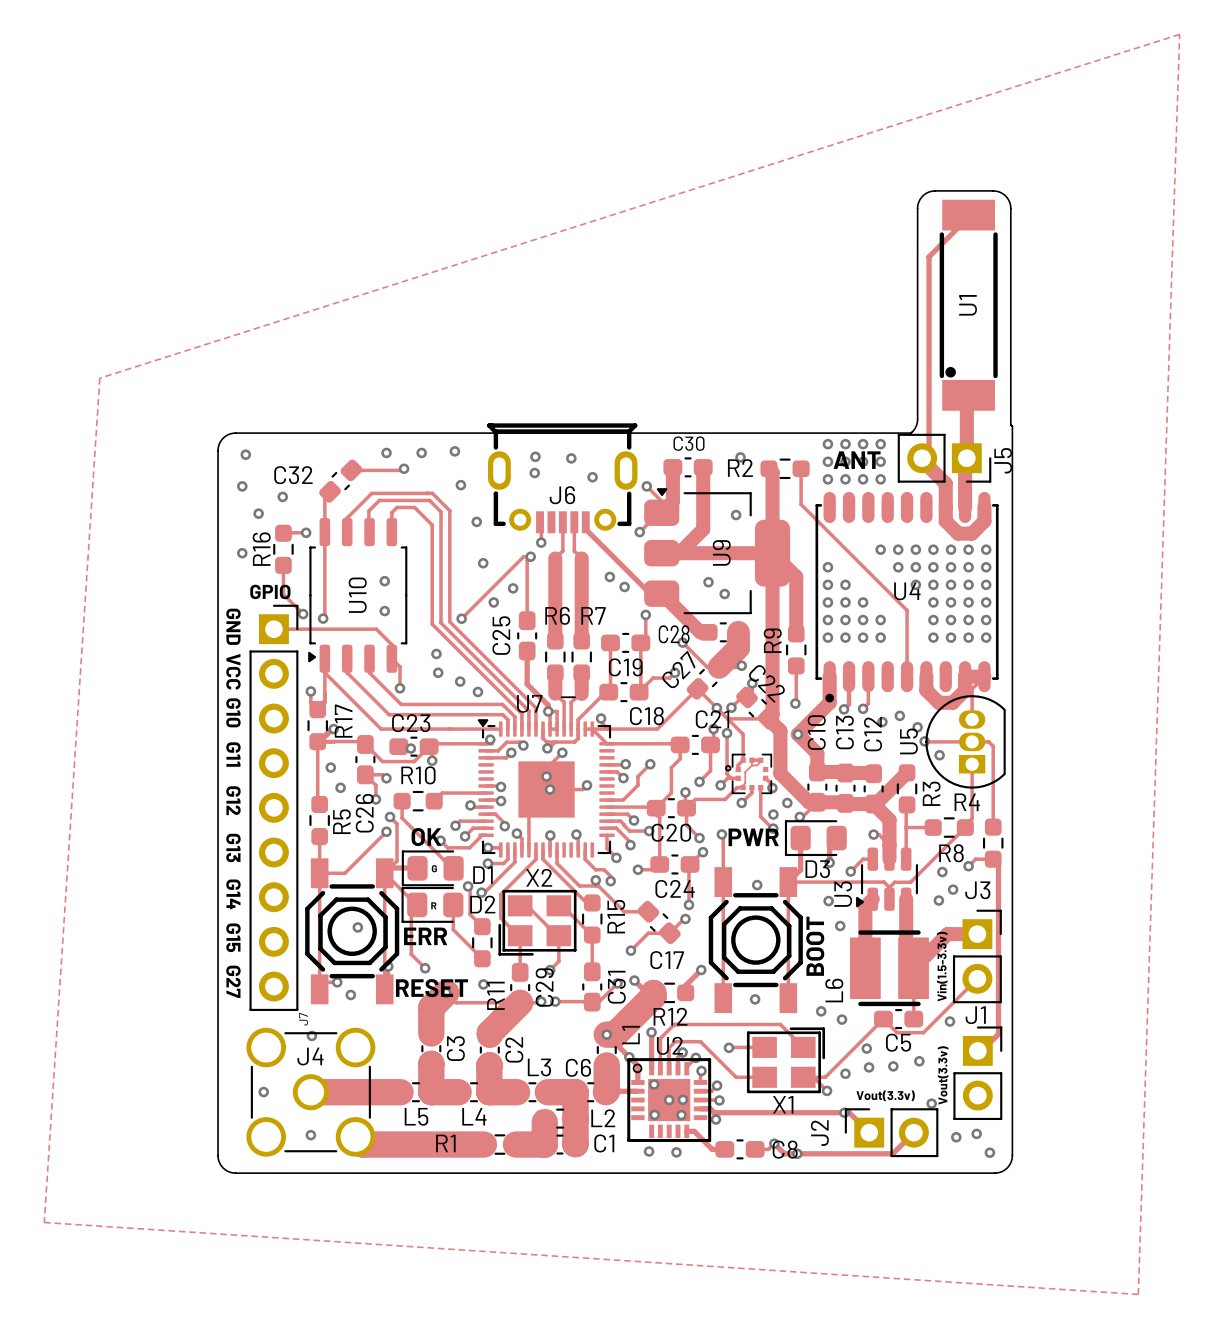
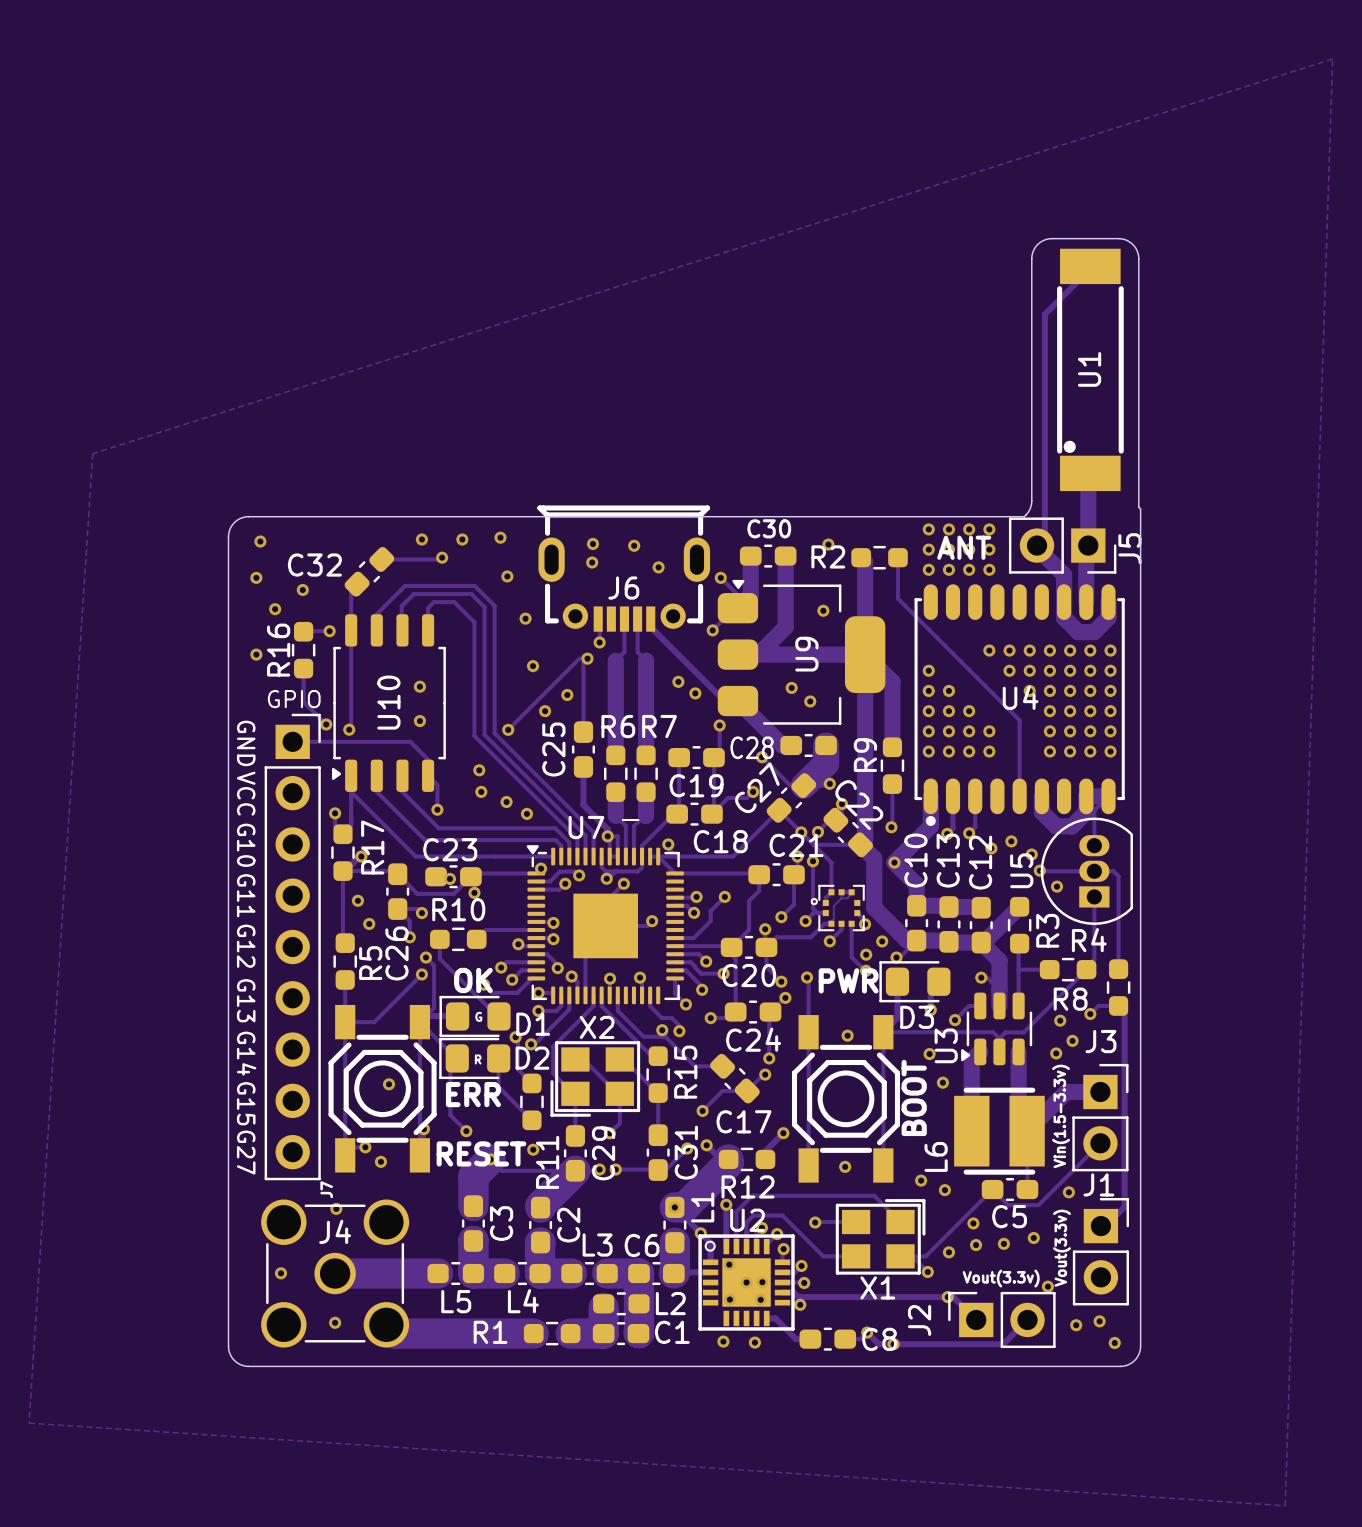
via: (546, 776) -> none
via: (550, 789) -> none

